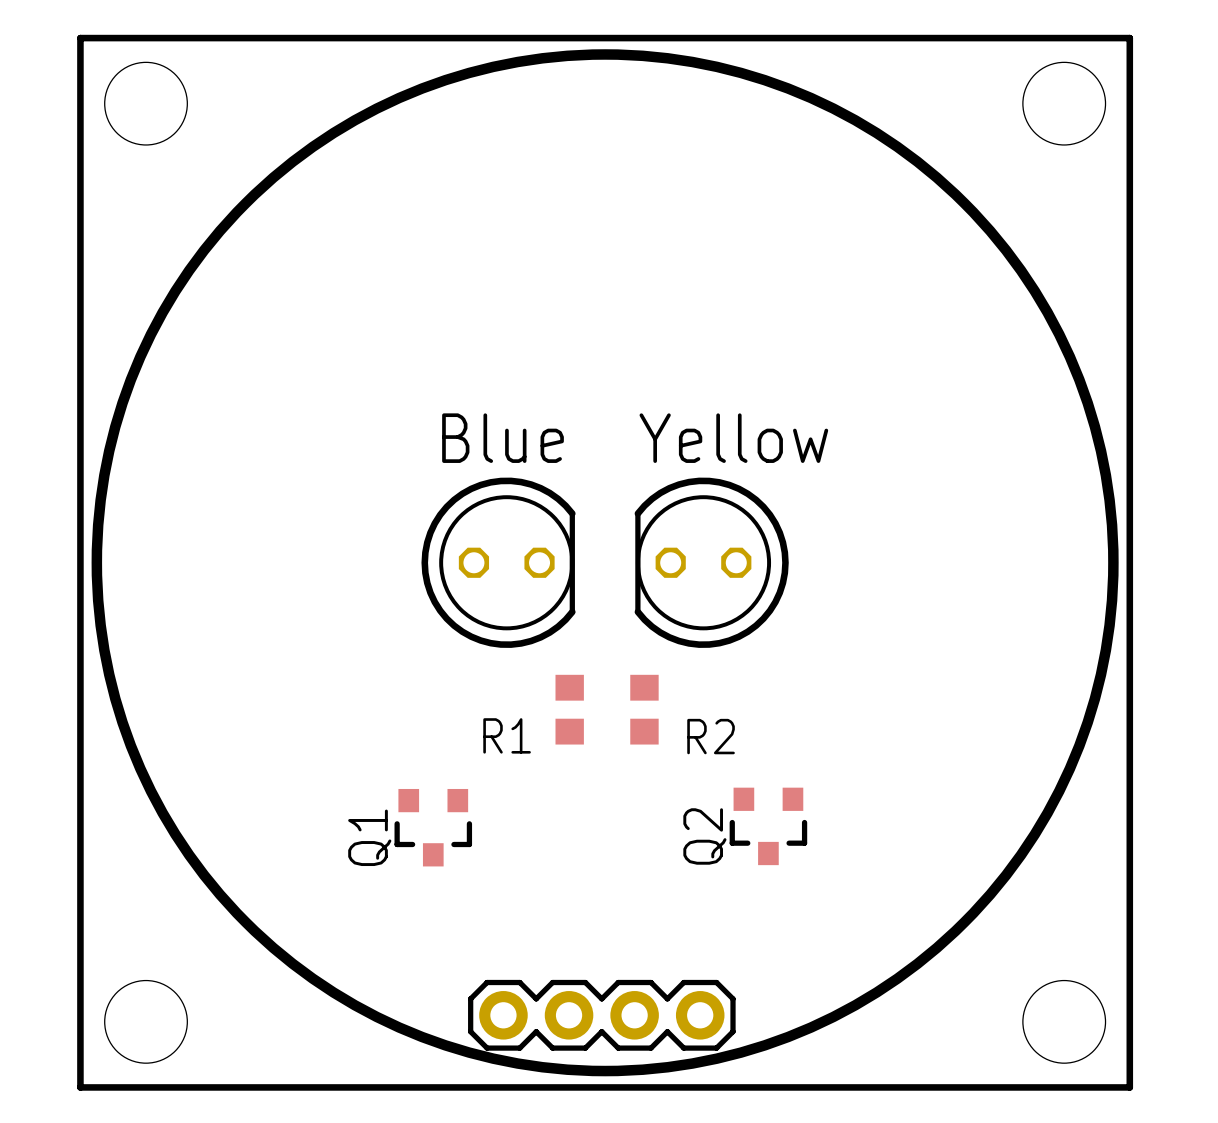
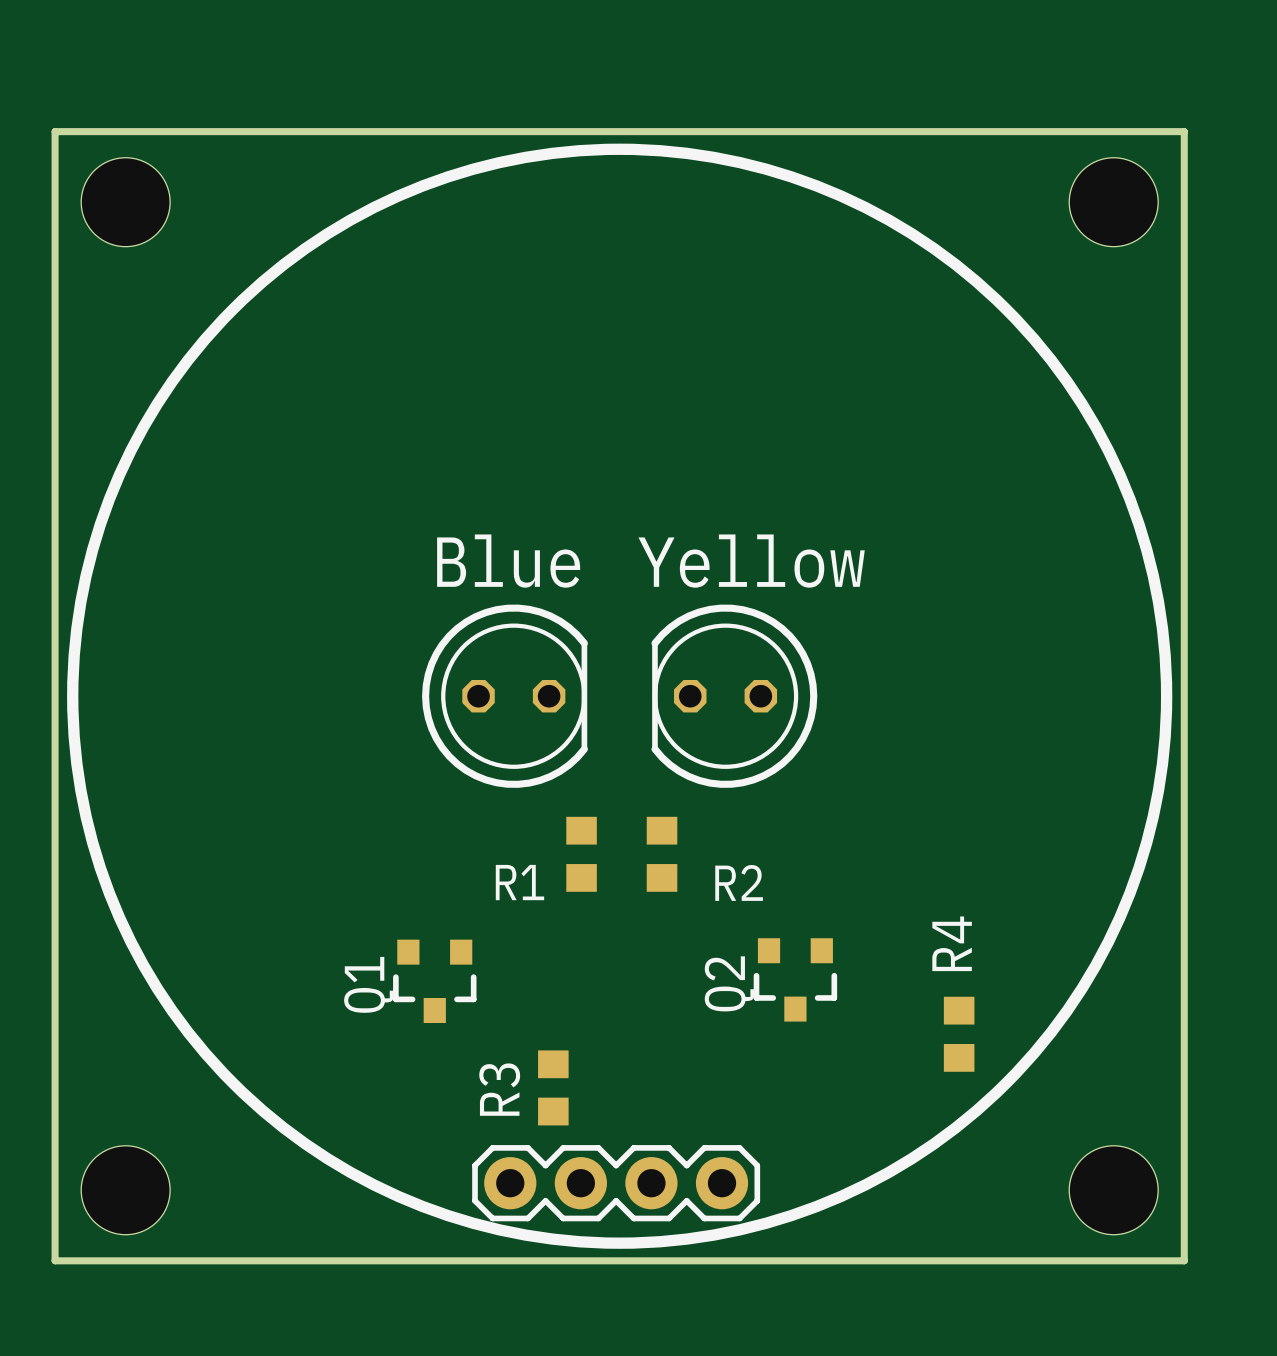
R4: none -> (959, 1034)
R3: none -> (553, 1087)

